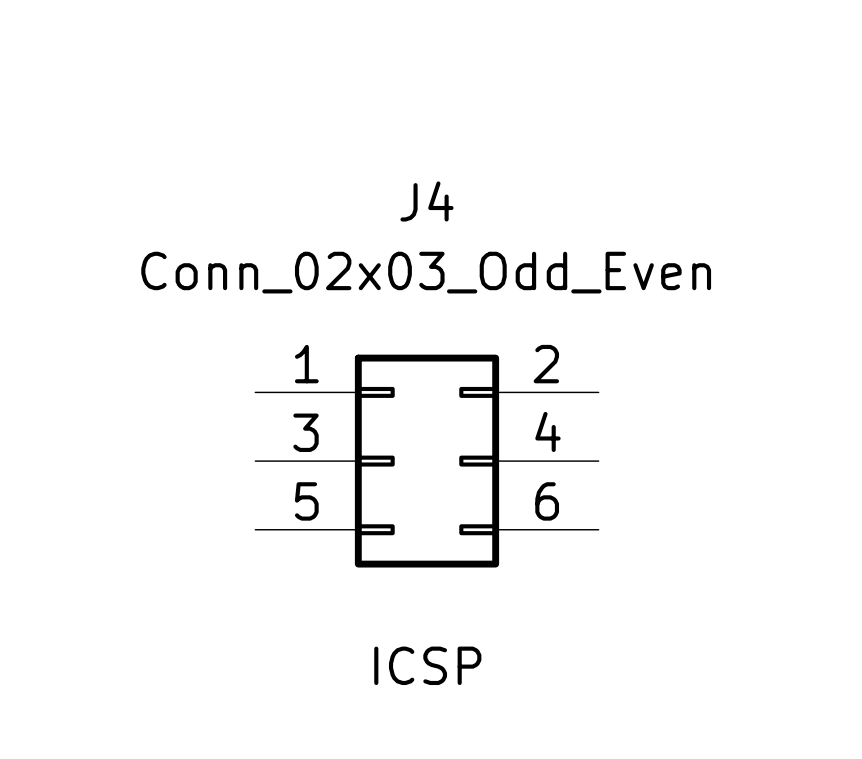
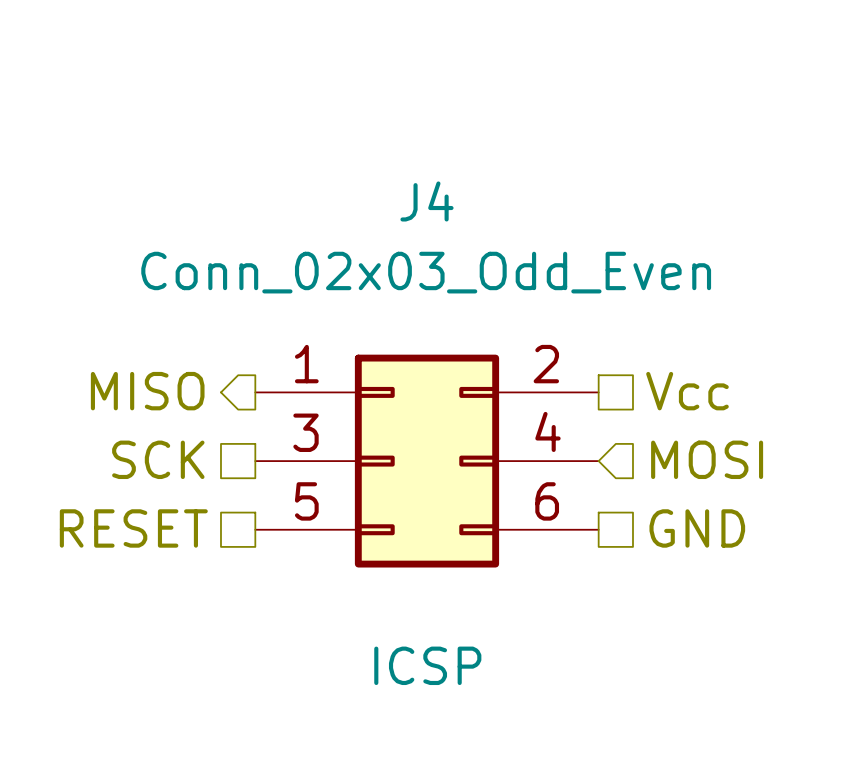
hierarchical label: none -> MISO (147, 391)
hierarchical label: none -> Vcc (687, 391)
hierarchical label: none -> SCK (158, 459)
hierarchical label: none -> MOSI (707, 459)
hierarchical label: none -> RESET (133, 528)
hierarchical label: none -> GND (697, 528)

